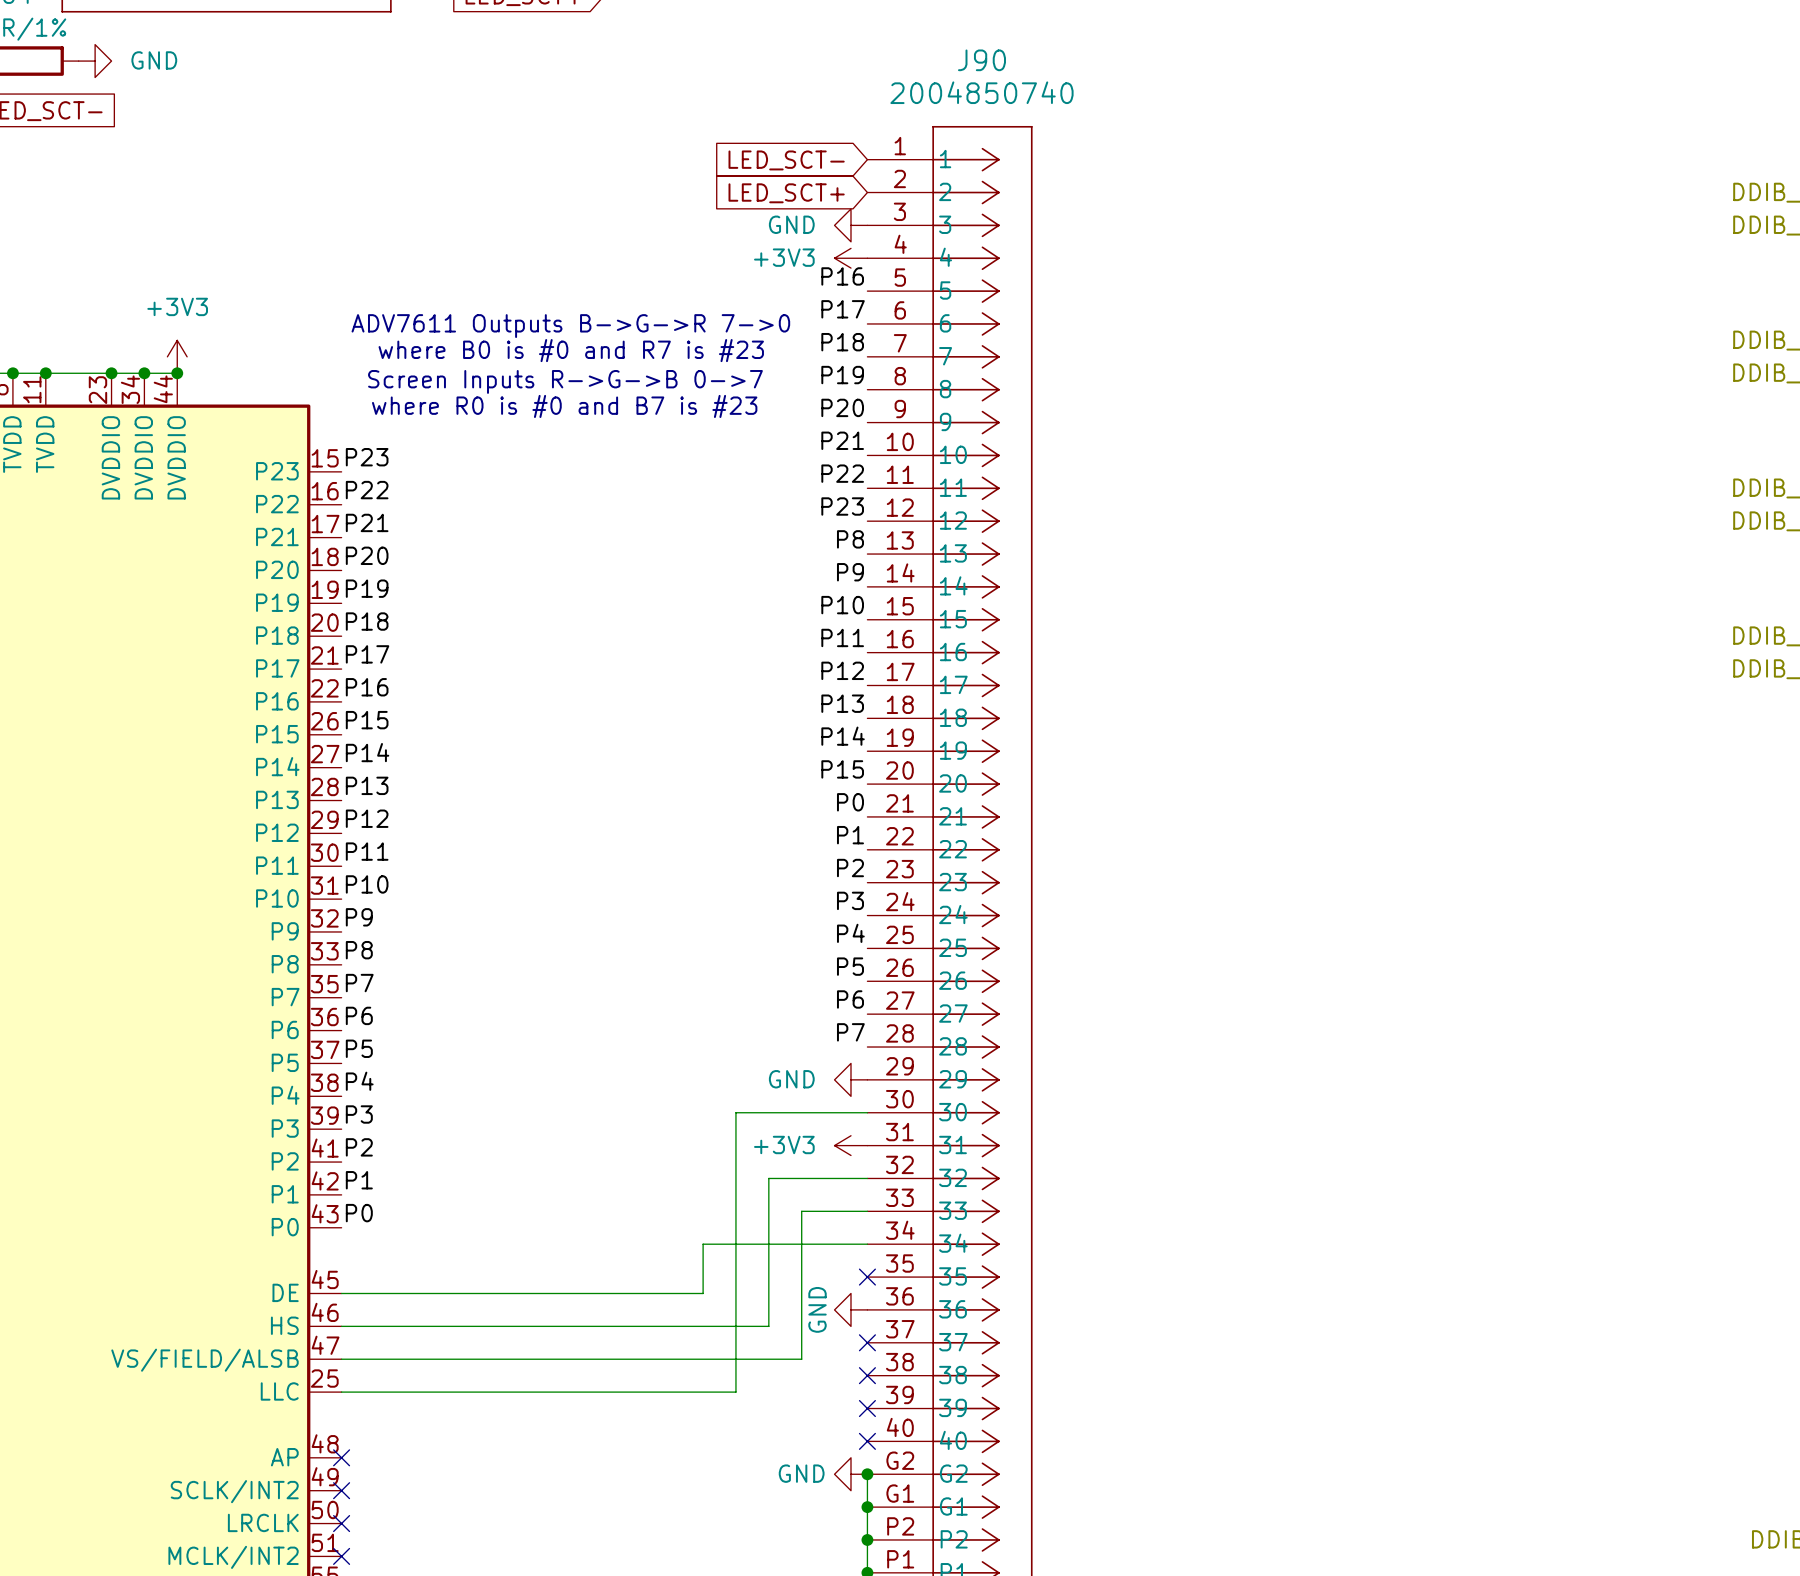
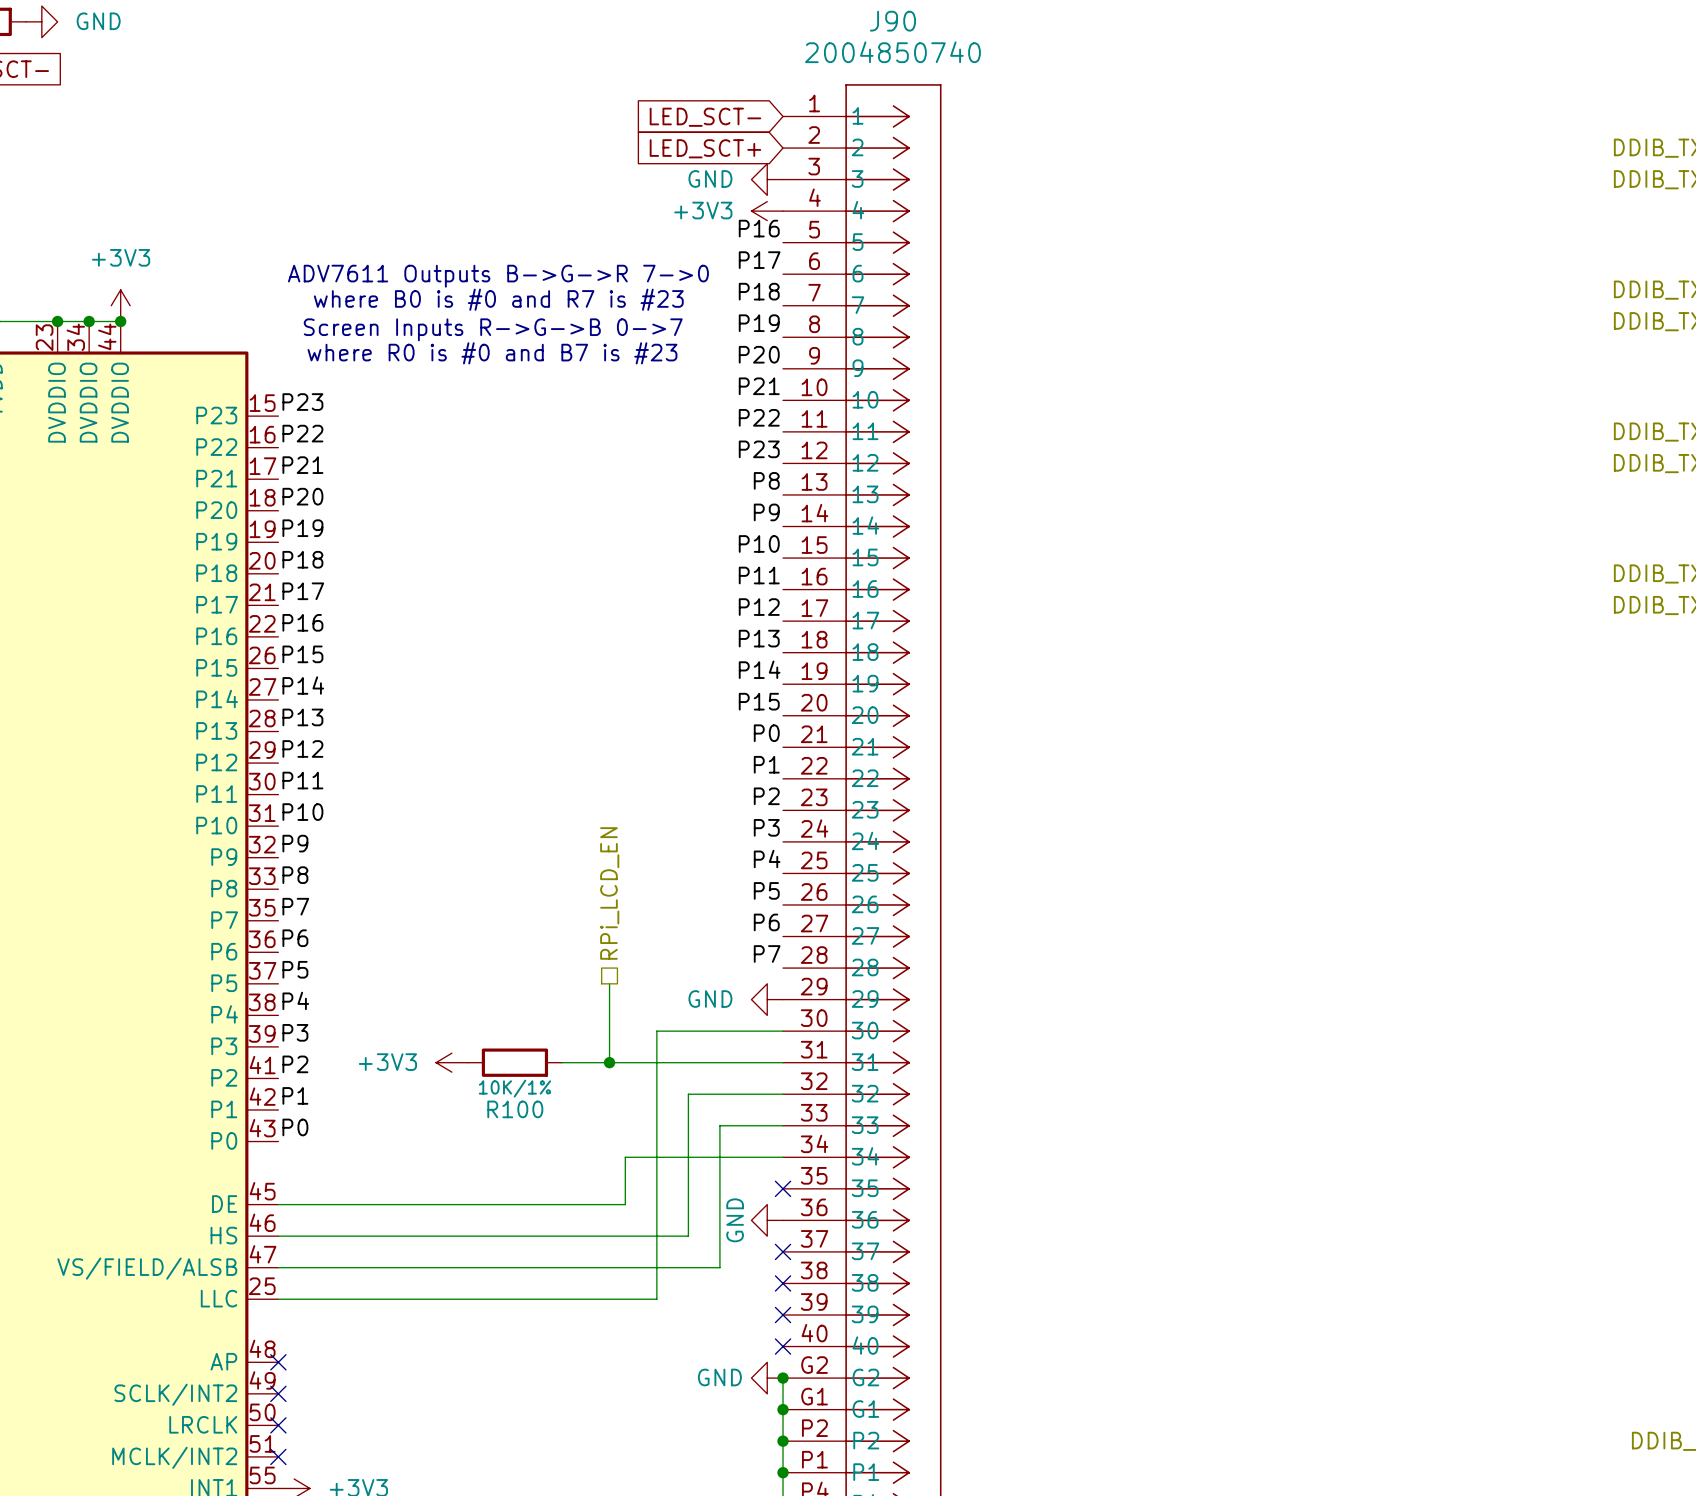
hierarchical label: none -> RPi_LCD_EN (609, 893)
wire: none -> (609, 983) (609, 1062)
power symbol: none -> +3V3 (451, 1062)
R100: none -> 10K/1% (514, 1062)
wire: none -> (562, 1062) (783, 1062)
junction: none -> (609, 1062)
power symbol: +3V3 (850, 1145) -> none

